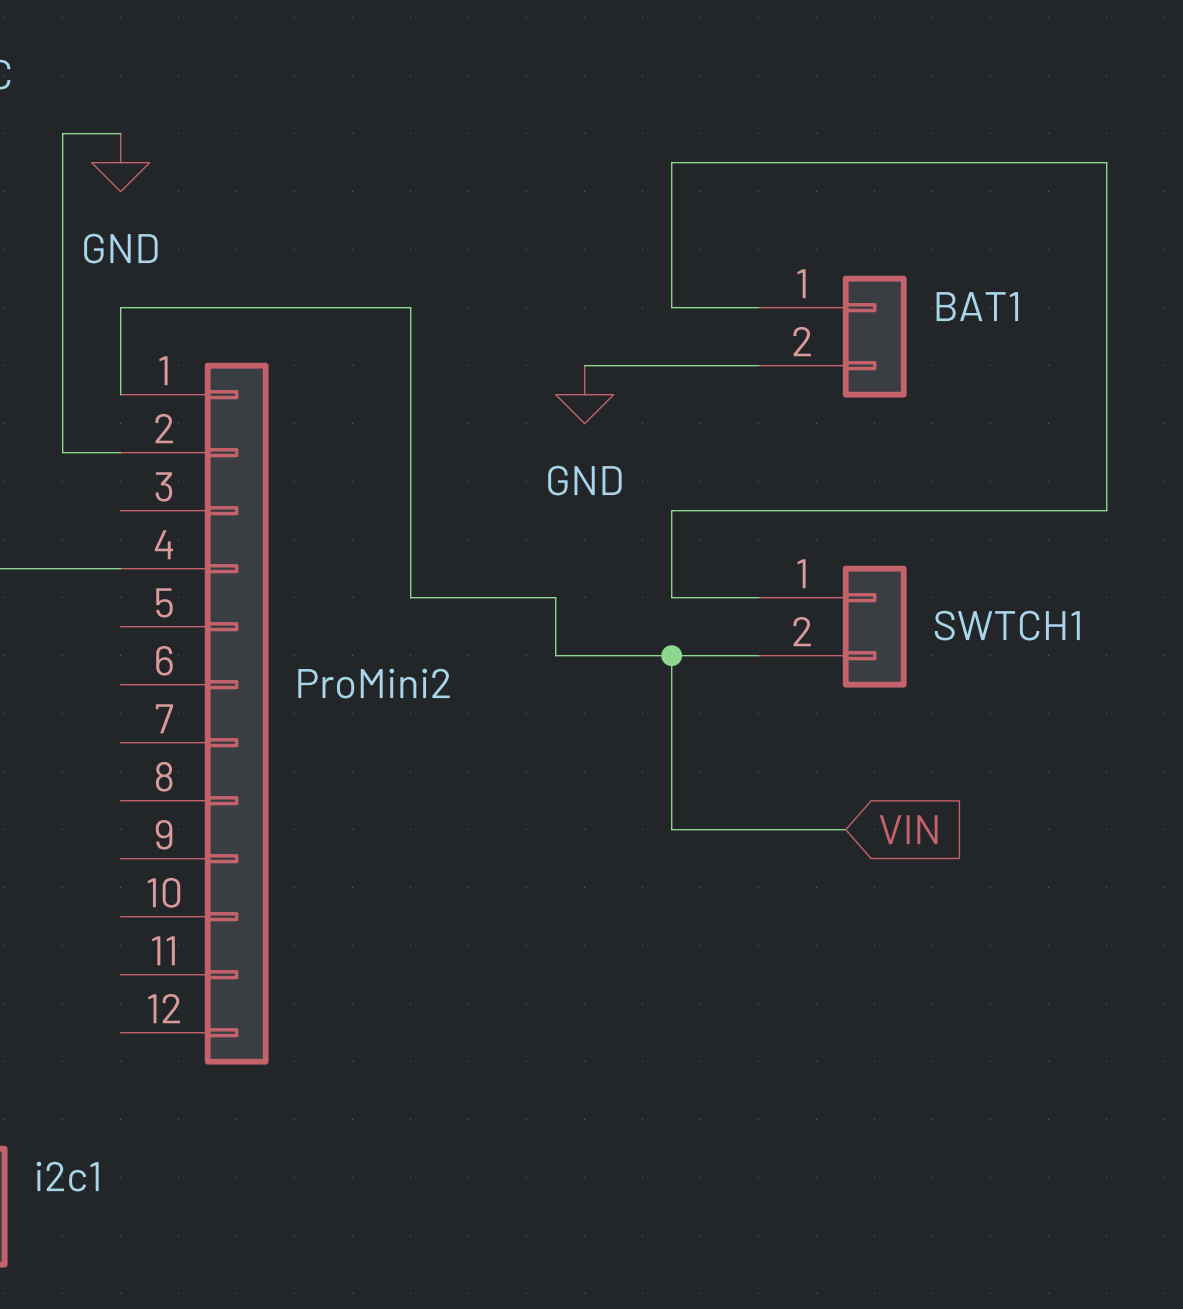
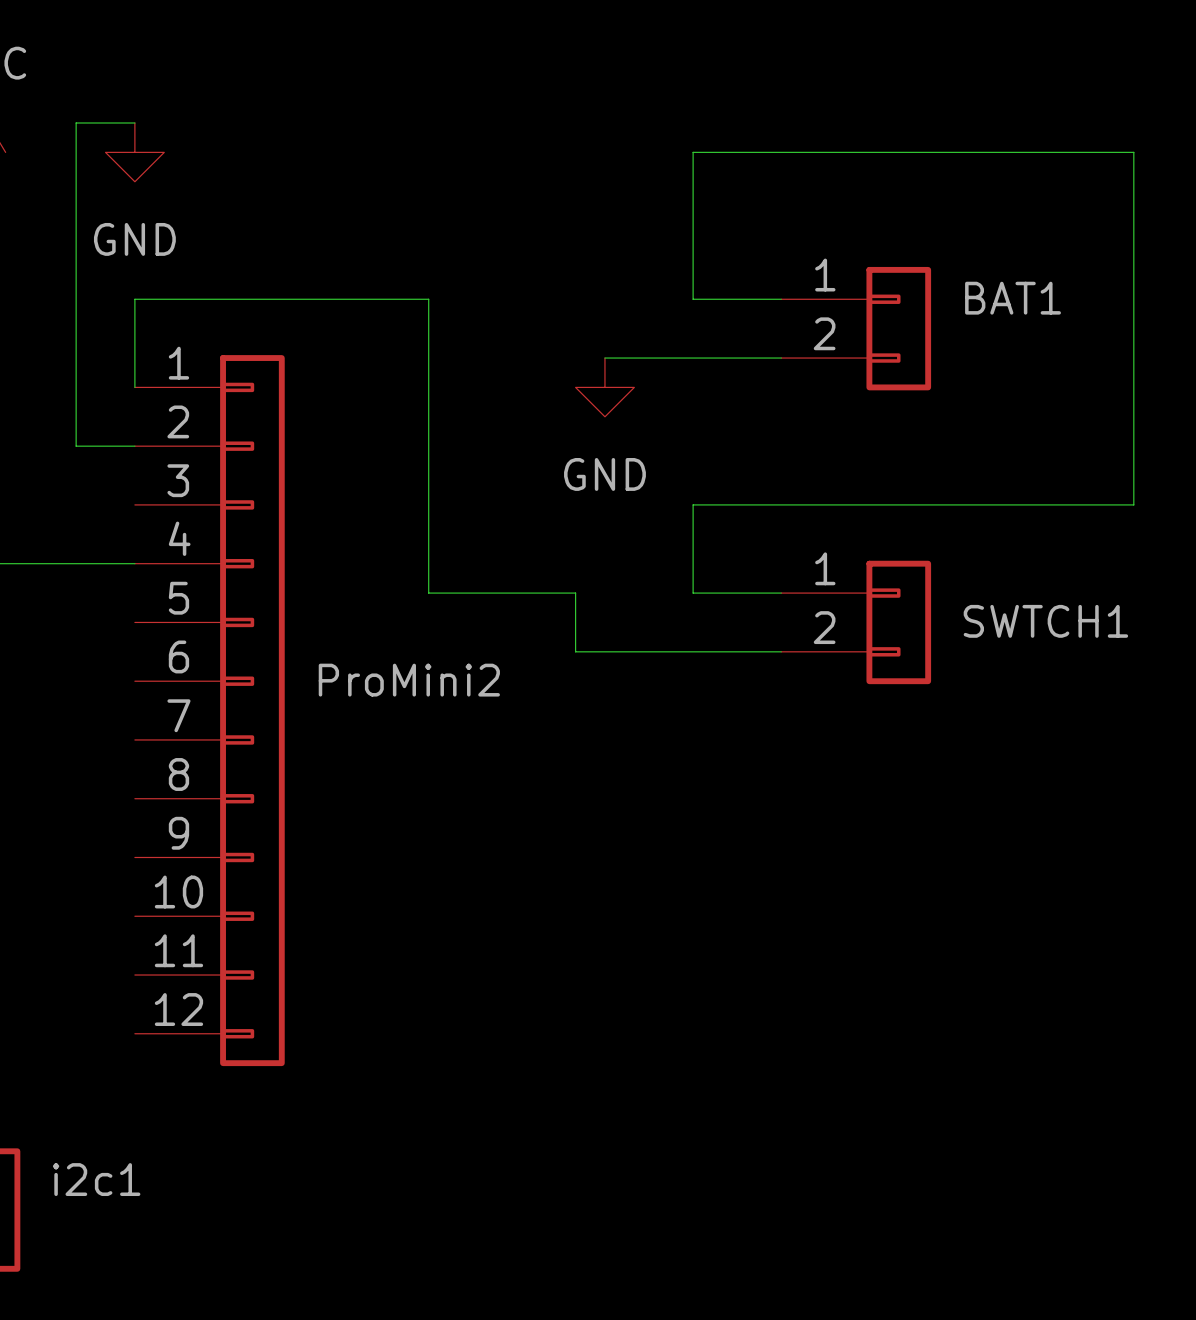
wire: (671, 655) (671, 829) (845, 829) -> none
junction: (671, 655) -> none
global label: VIN (908, 829) -> none

